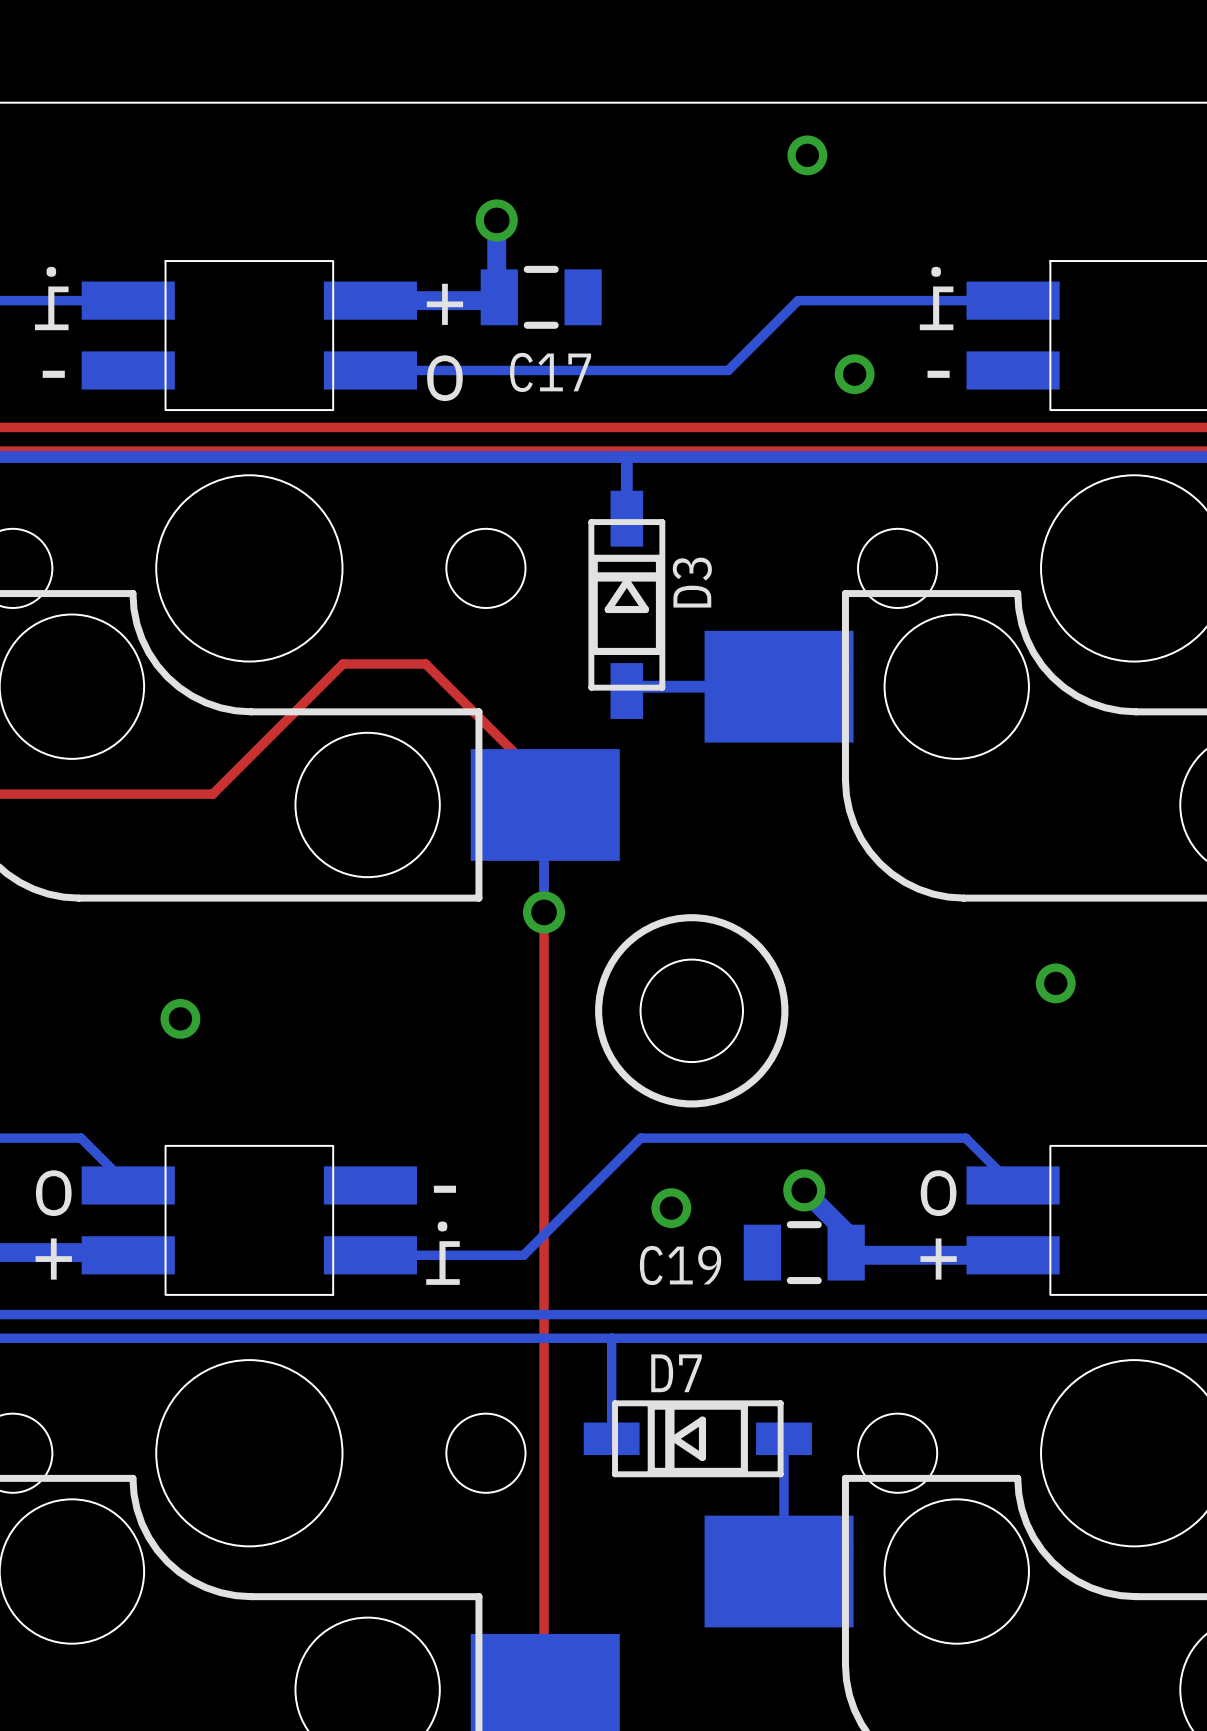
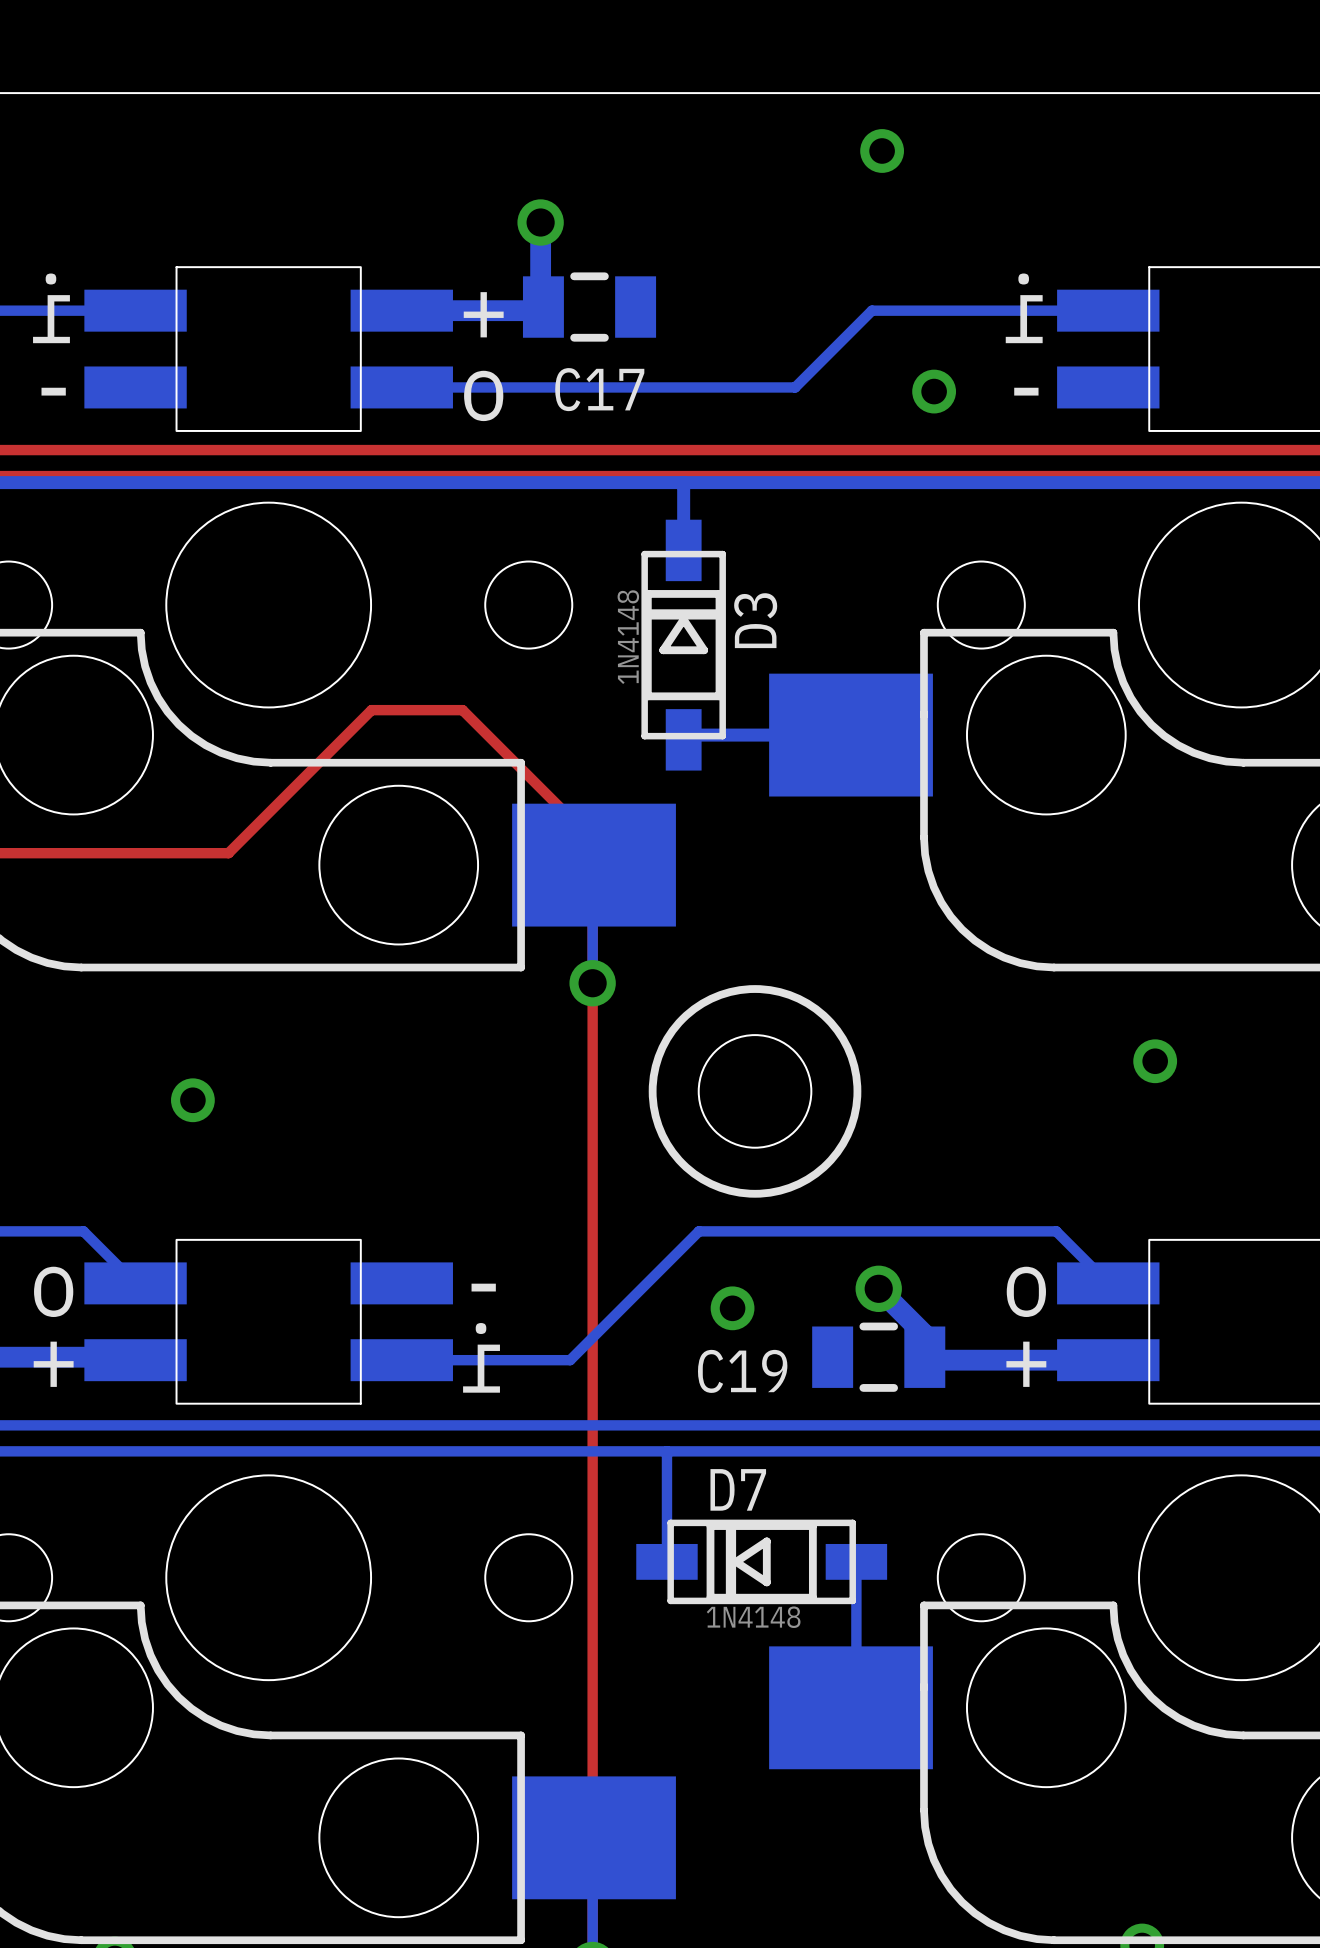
D3 value: none -> 1N4148 (628, 637)
D7 value: none -> 1N4148 (753, 1617)

